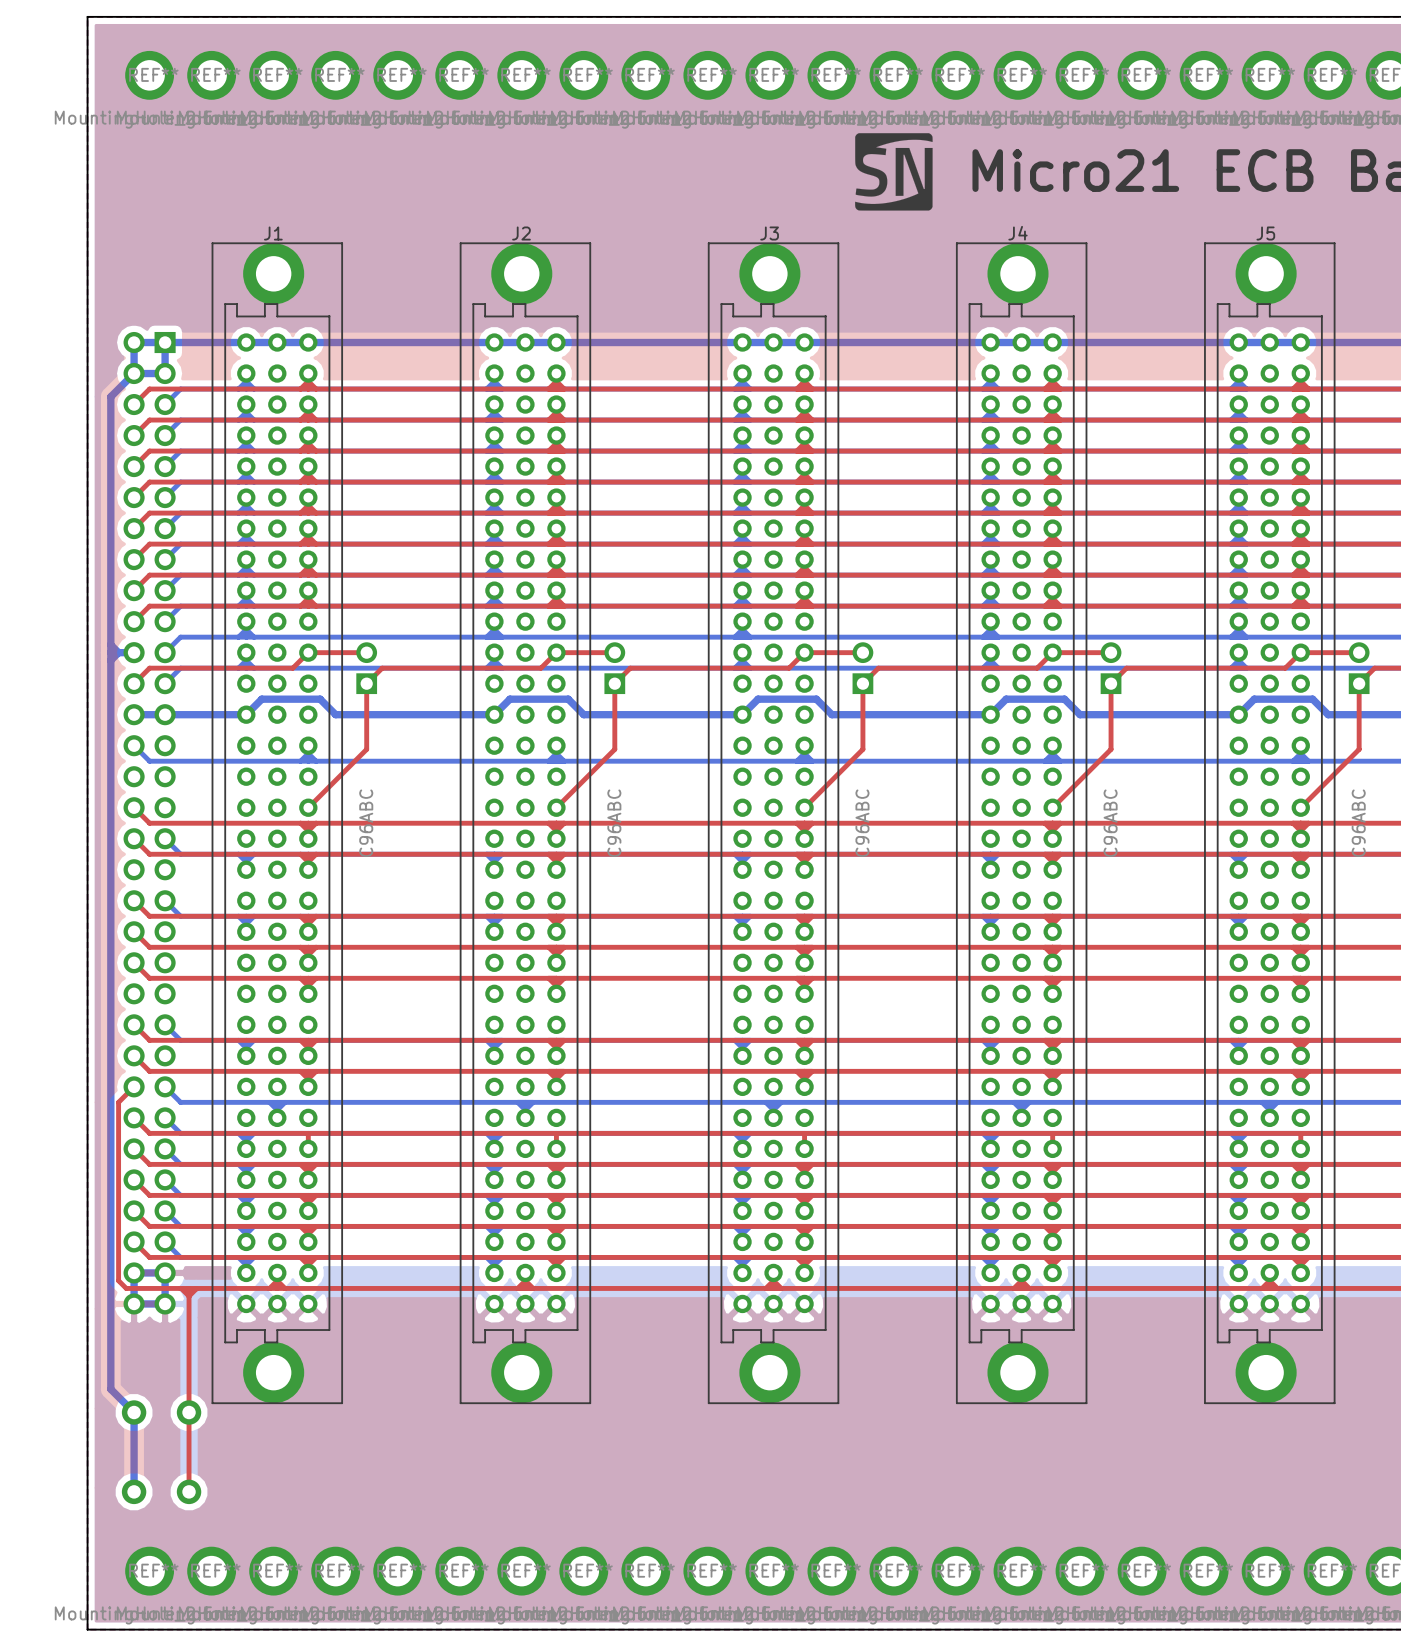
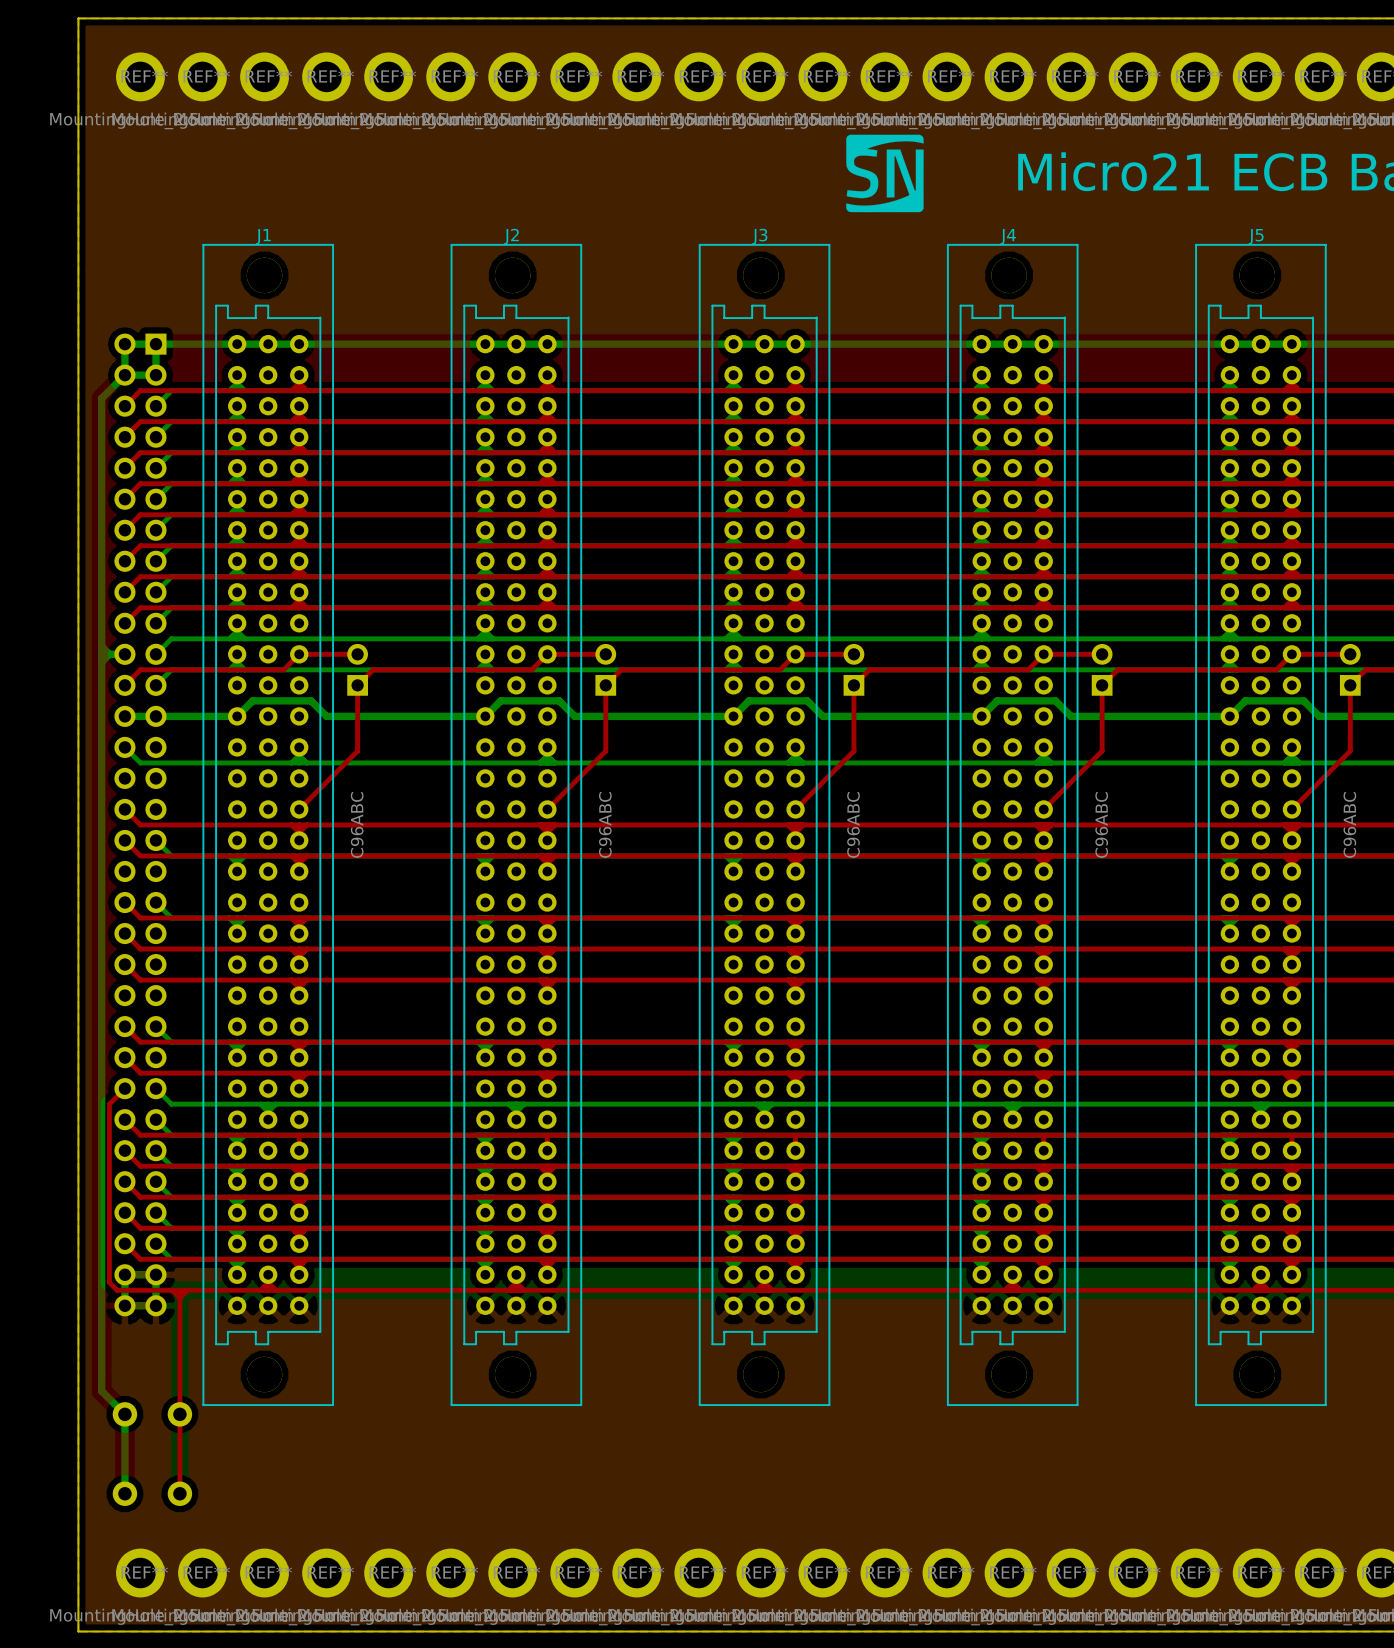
J1 footprint: [211, 242, 344, 1405] -> [202, 243, 334, 1406]
J2 footprint: [459, 242, 592, 1405] -> [450, 243, 583, 1406]
J3 footprint: [707, 242, 840, 1405] -> [698, 243, 831, 1406]
J4 footprint: [955, 242, 1088, 1405] -> [946, 243, 1079, 1406]
J5 footprint: [1204, 242, 1336, 1405] -> [1195, 243, 1327, 1406]

